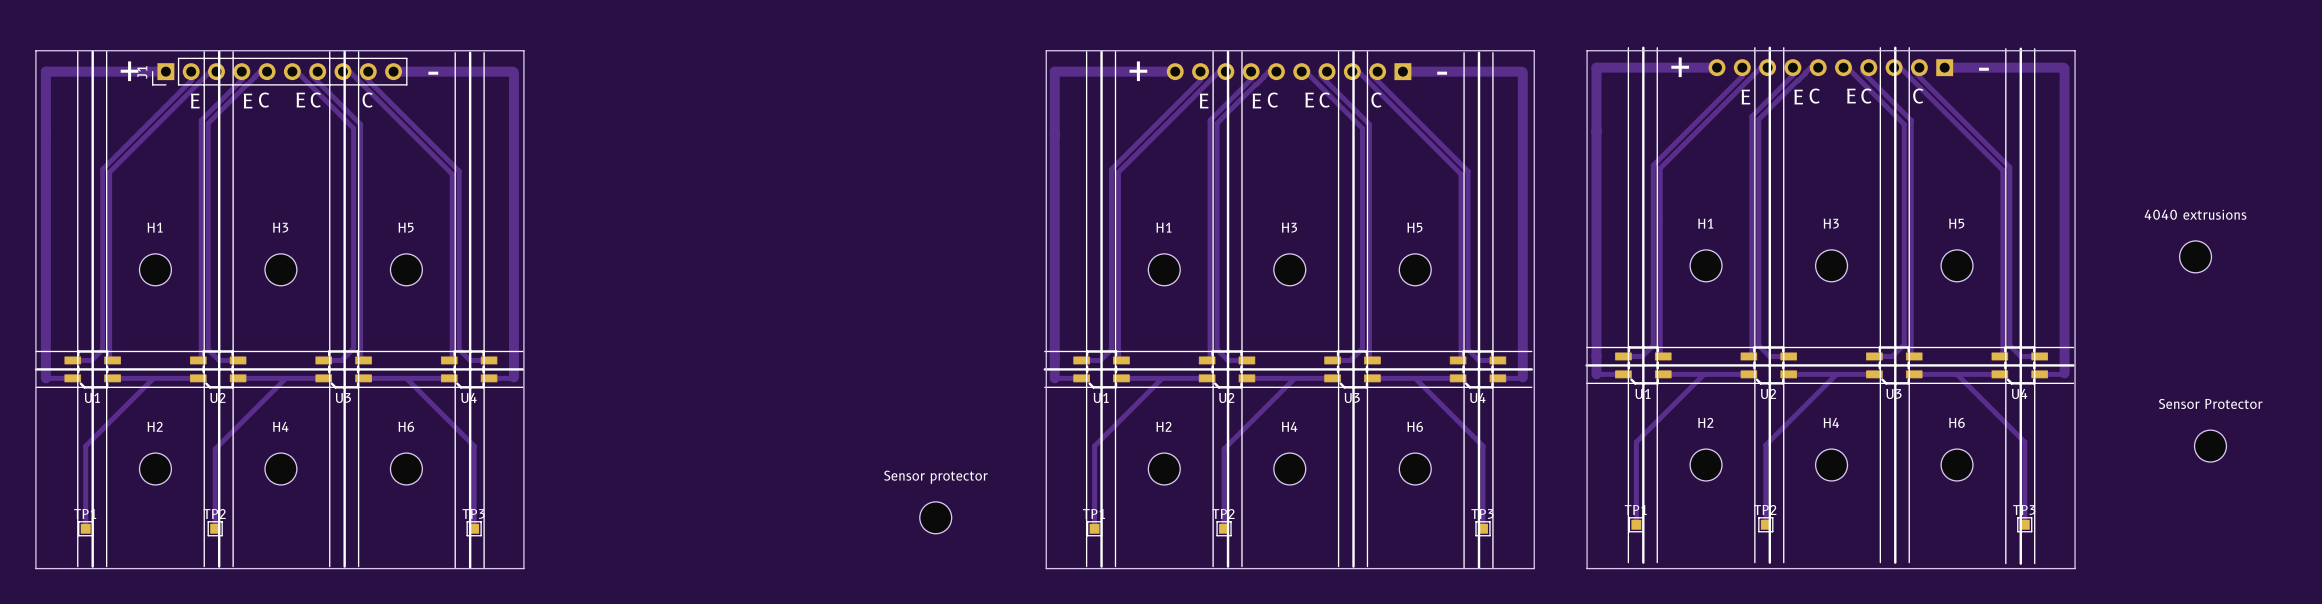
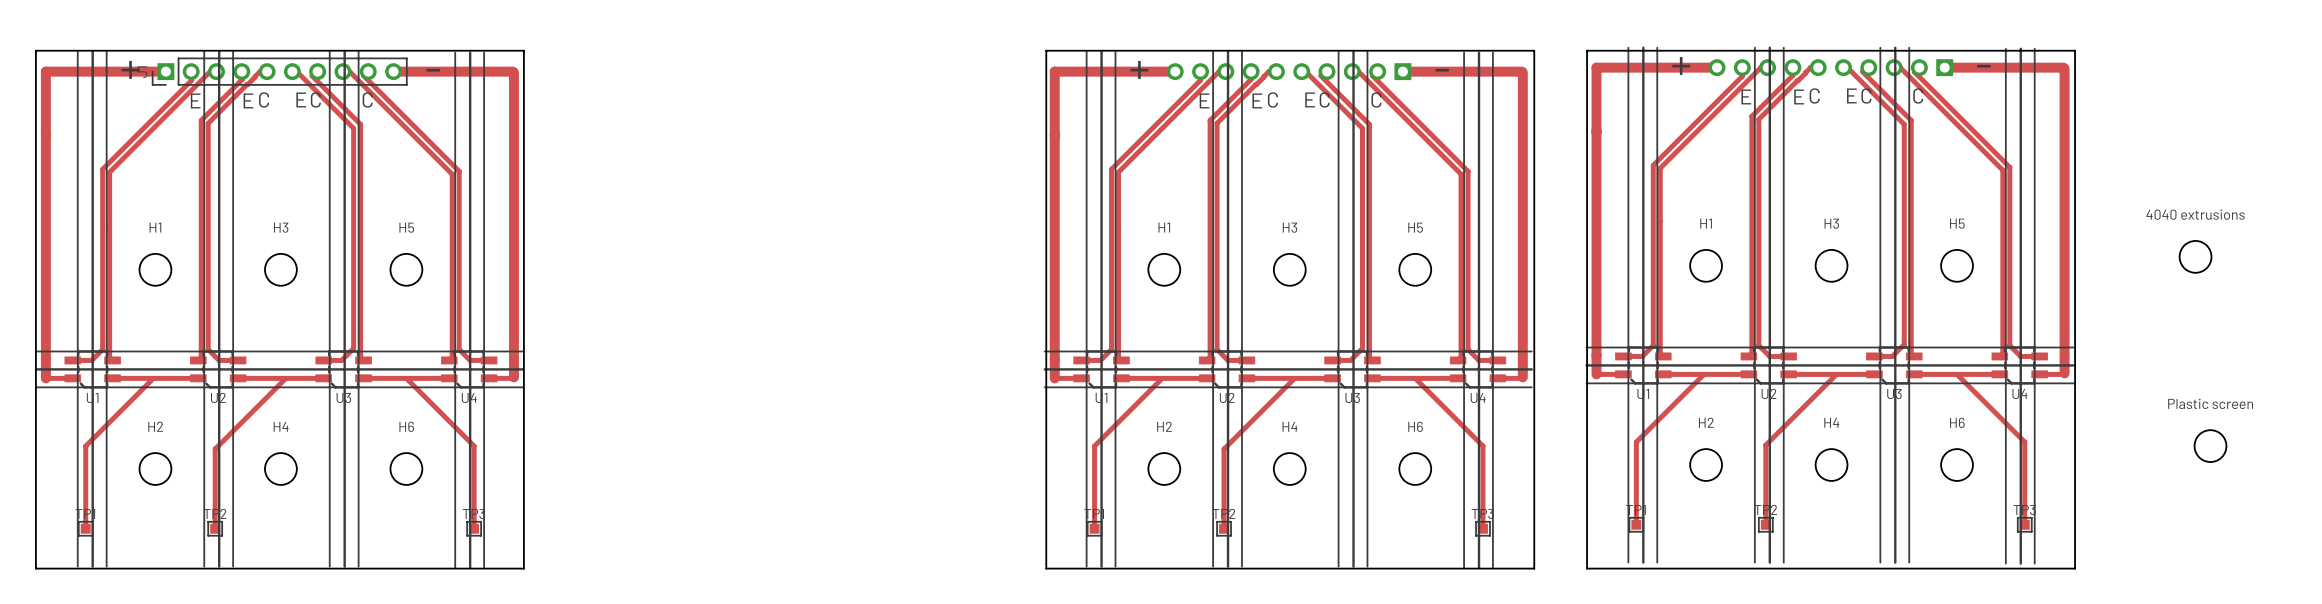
Sensor Protector name: Sensor Protector (2210, 403) -> Plastic screen (2210, 403)
Sensor protector: (935, 517) -> none

